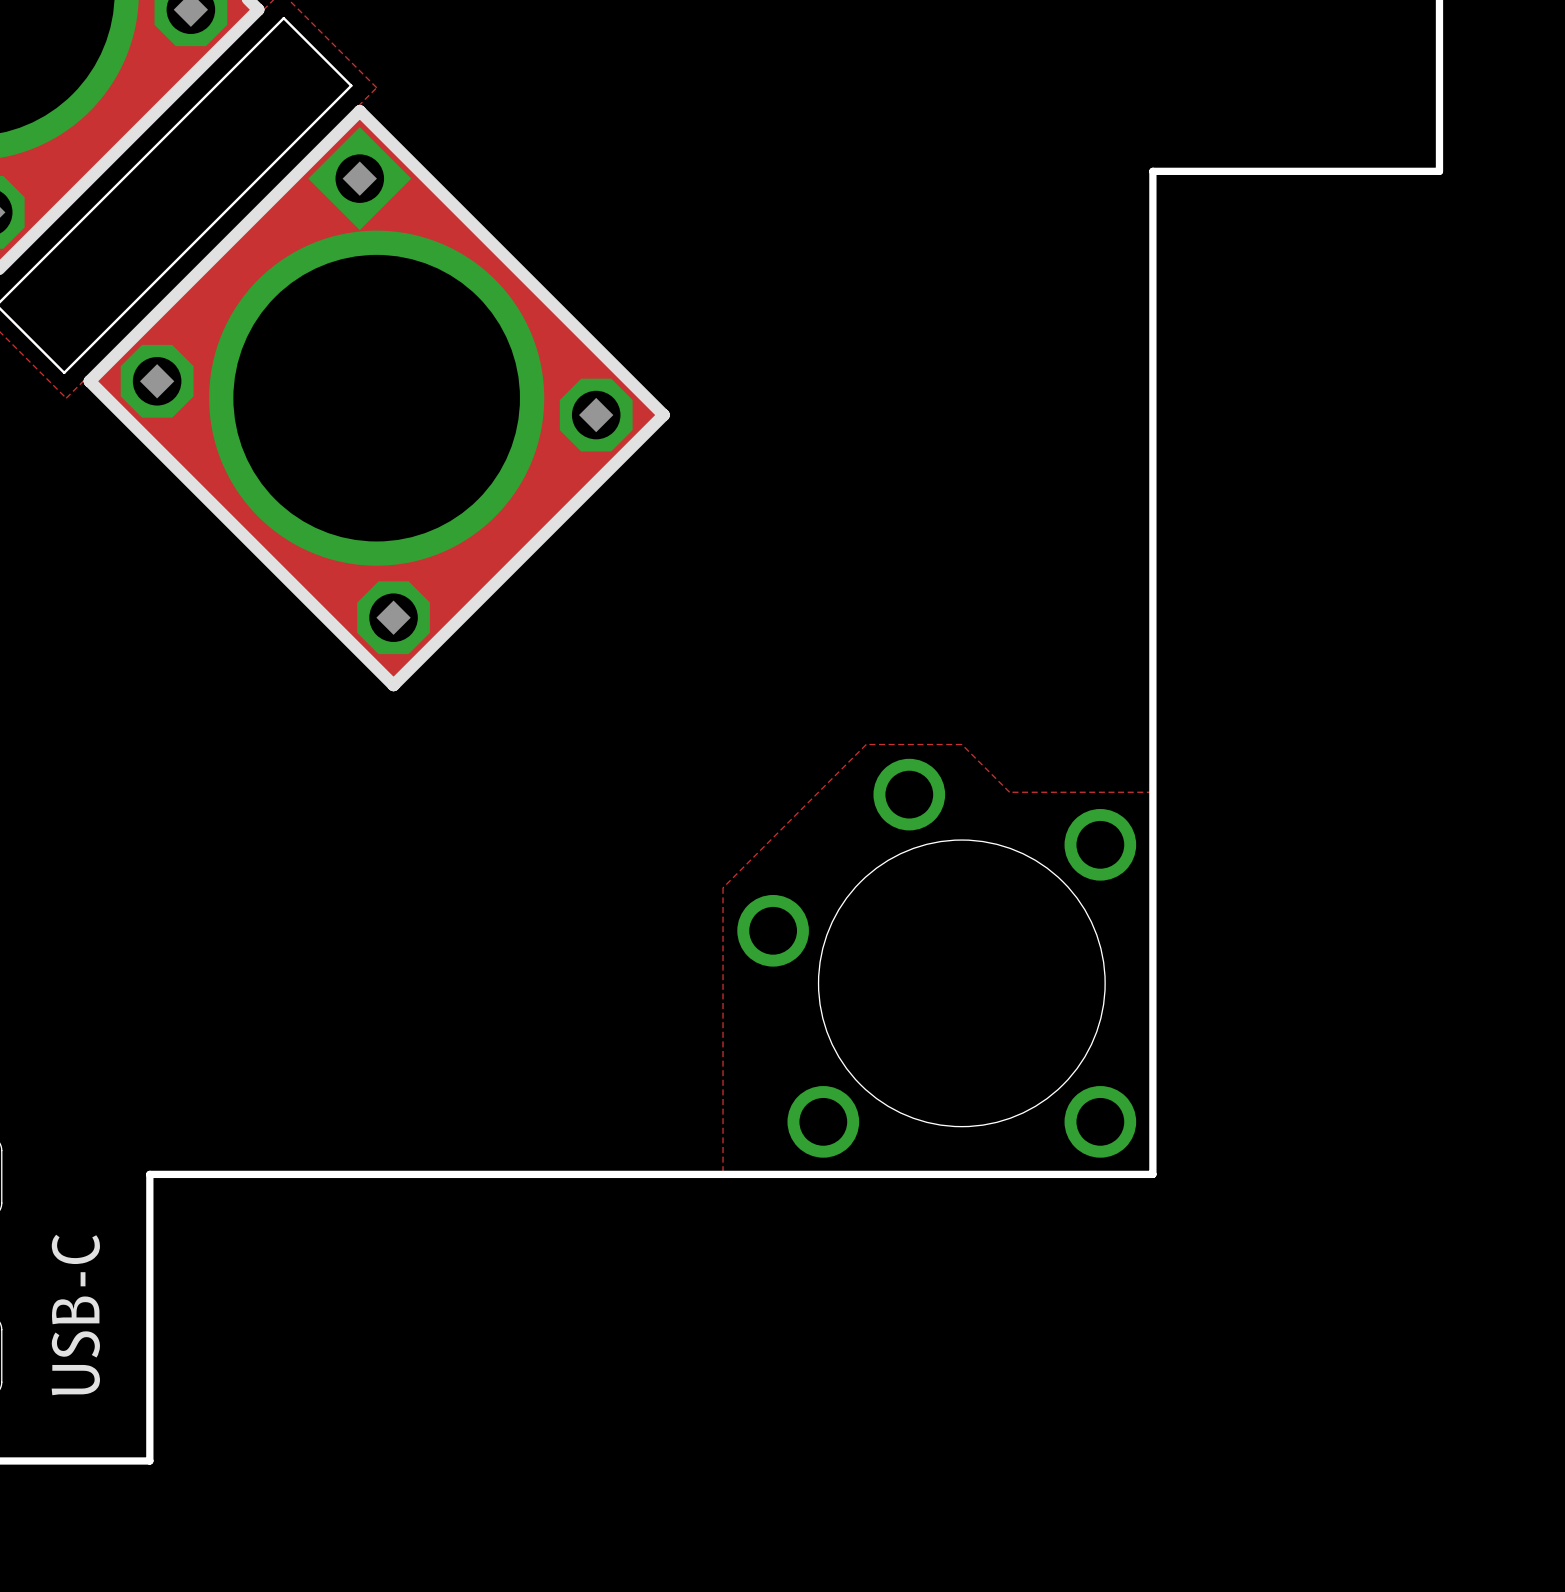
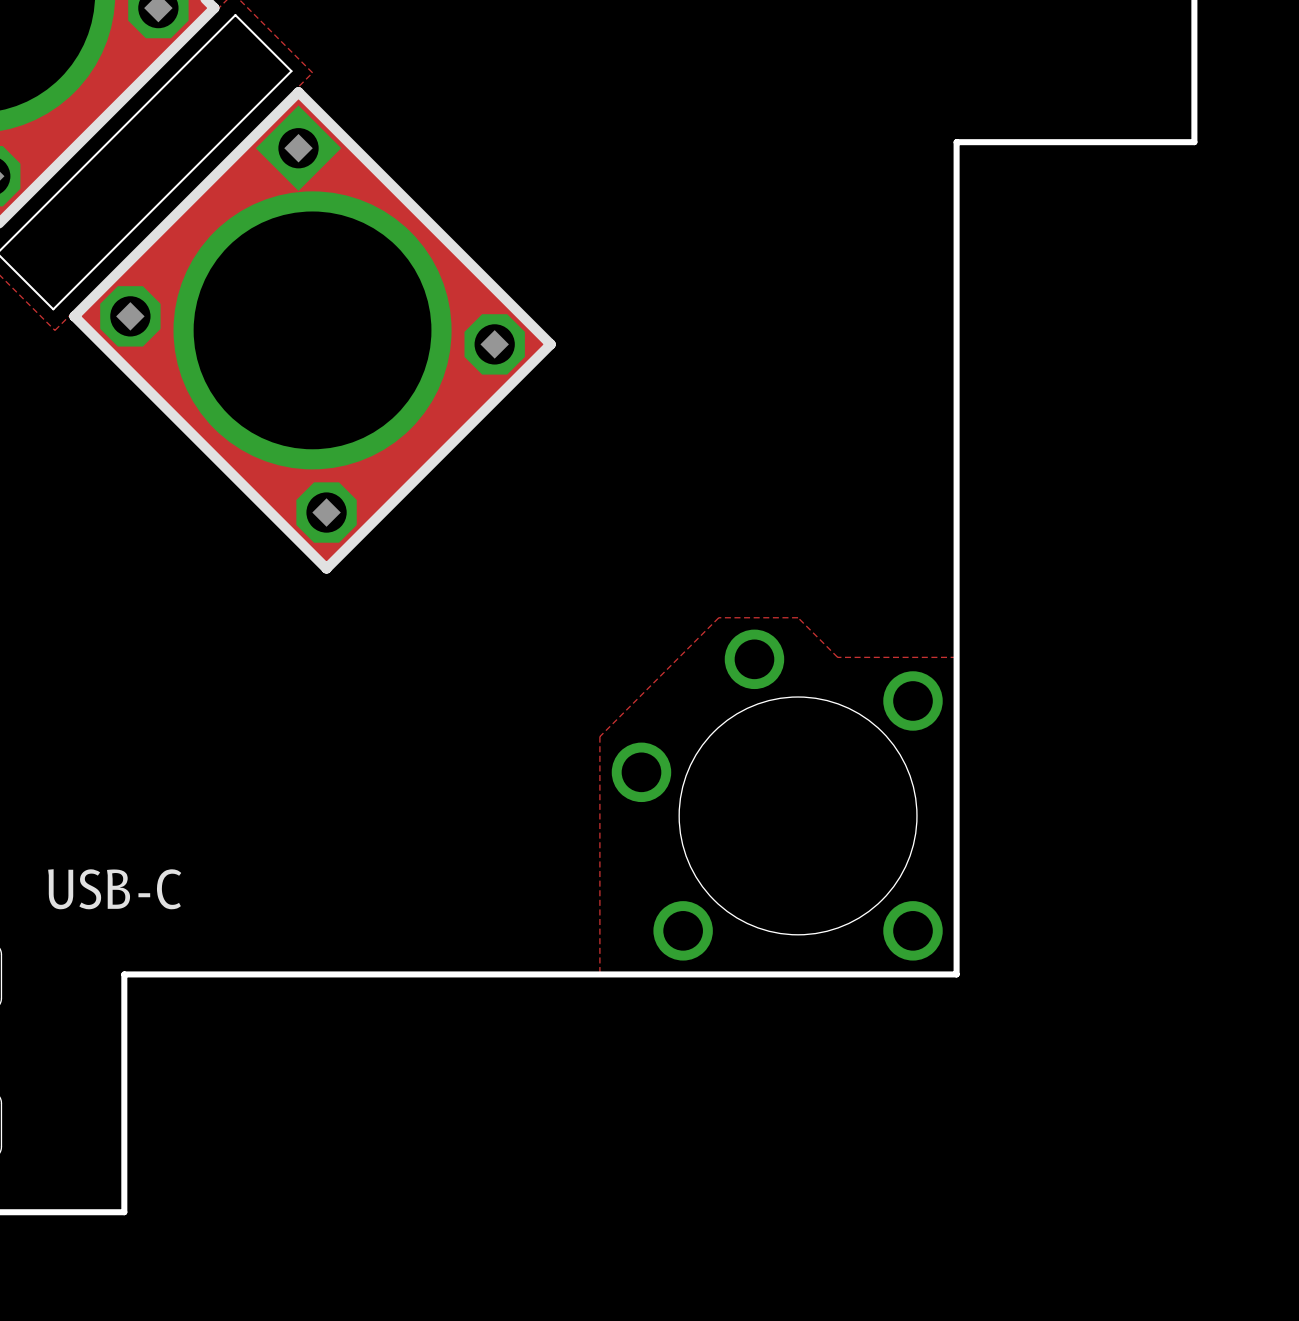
USB-C name rotation: 0° (75, 1315) -> 90° clockwise (114, 889)

